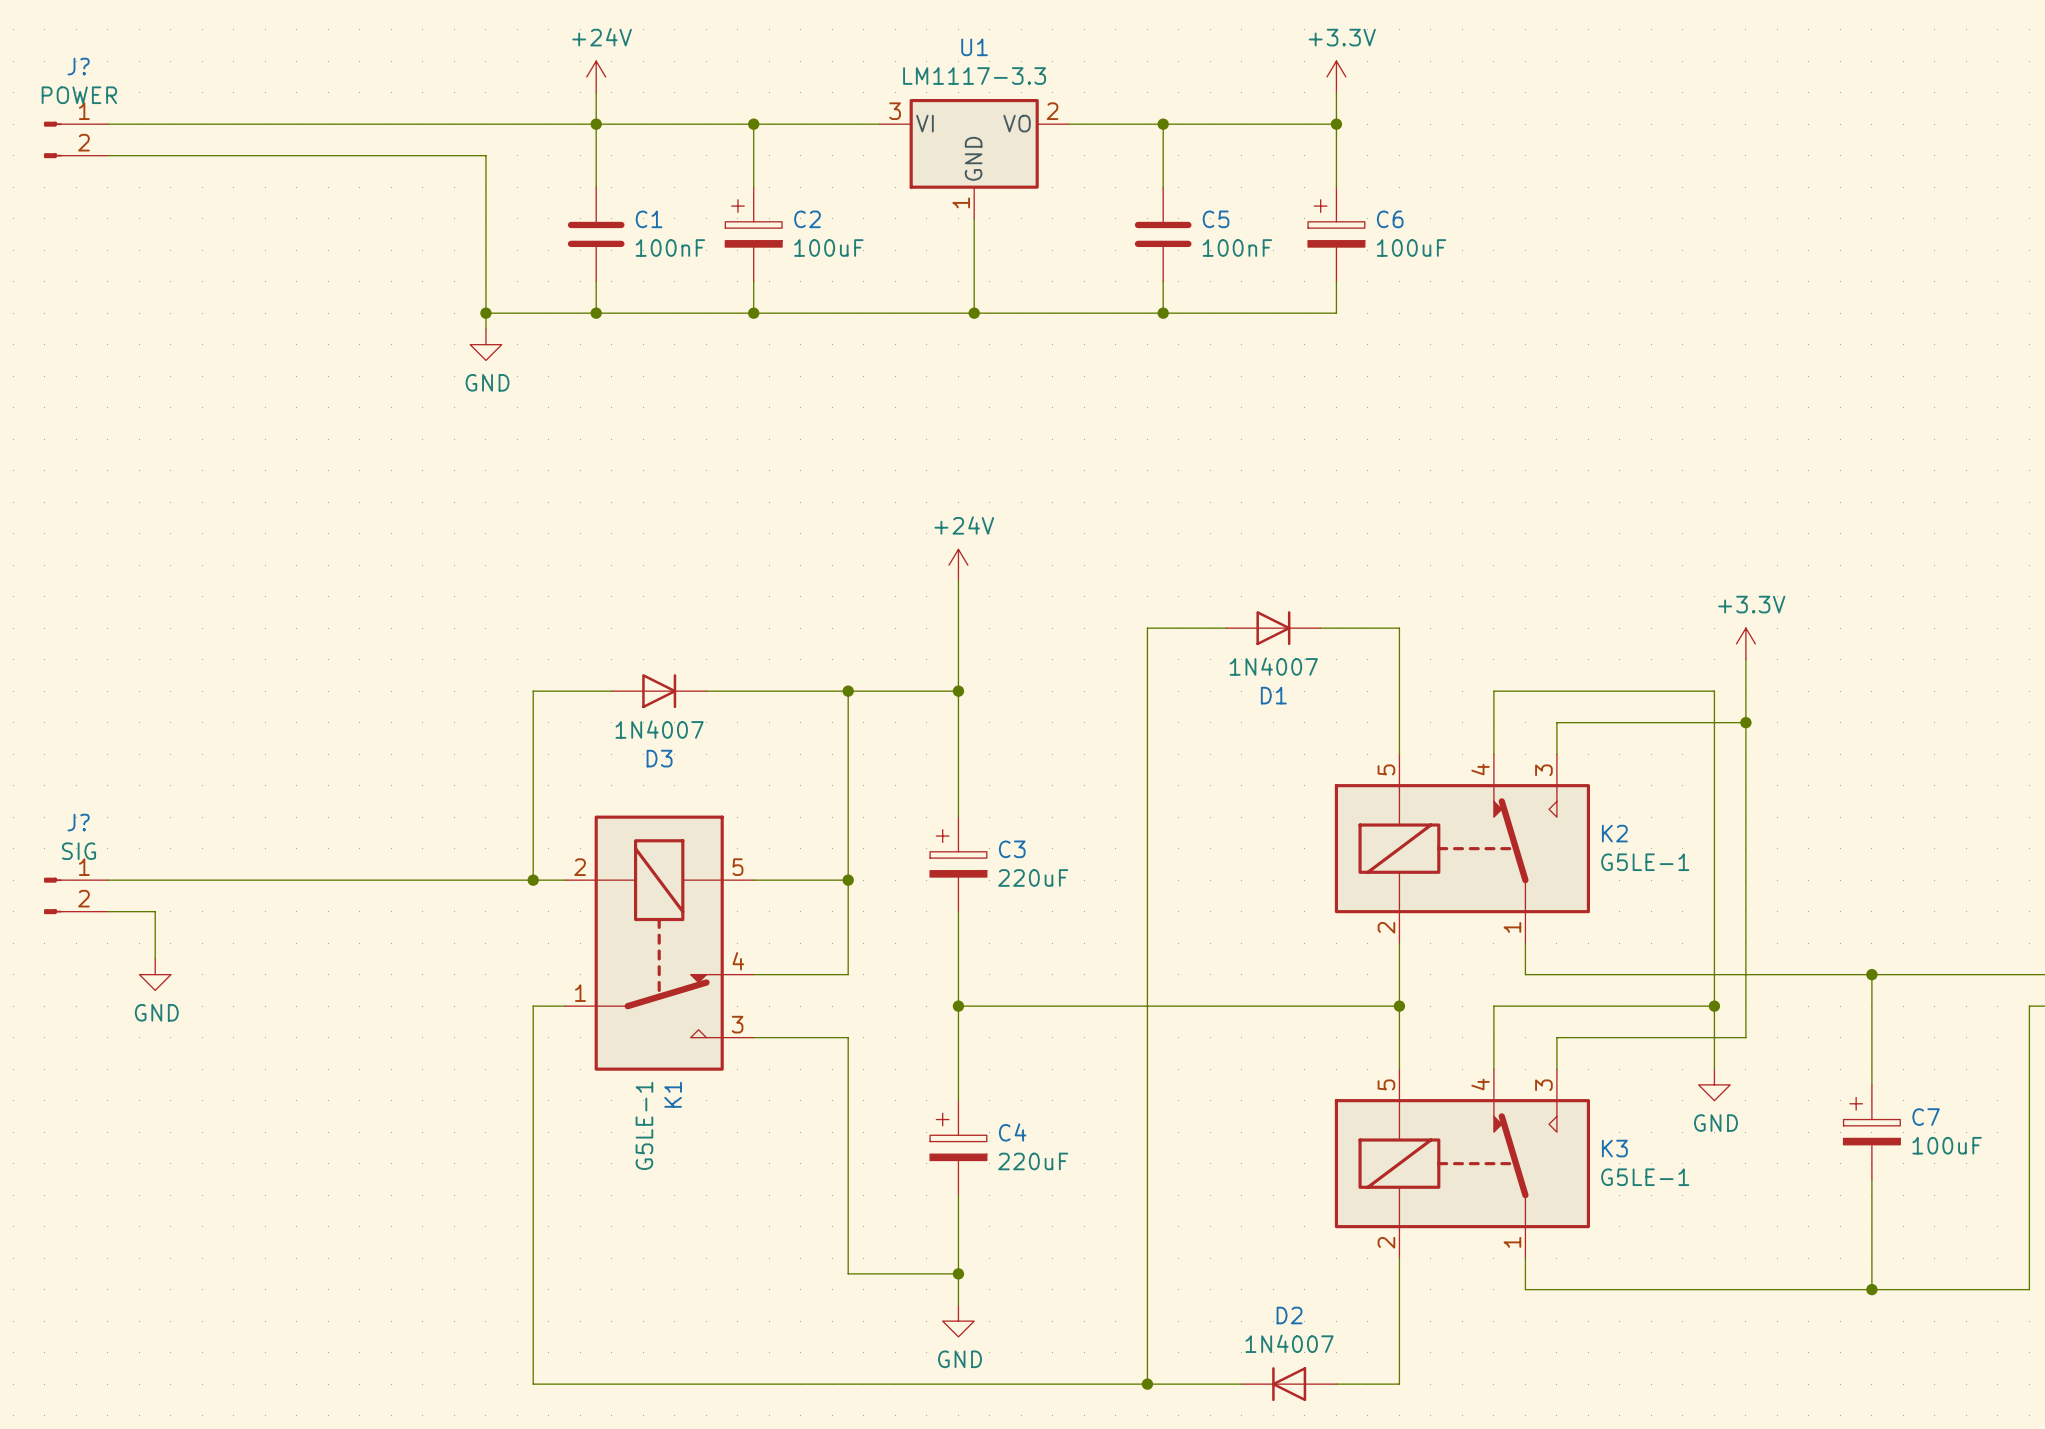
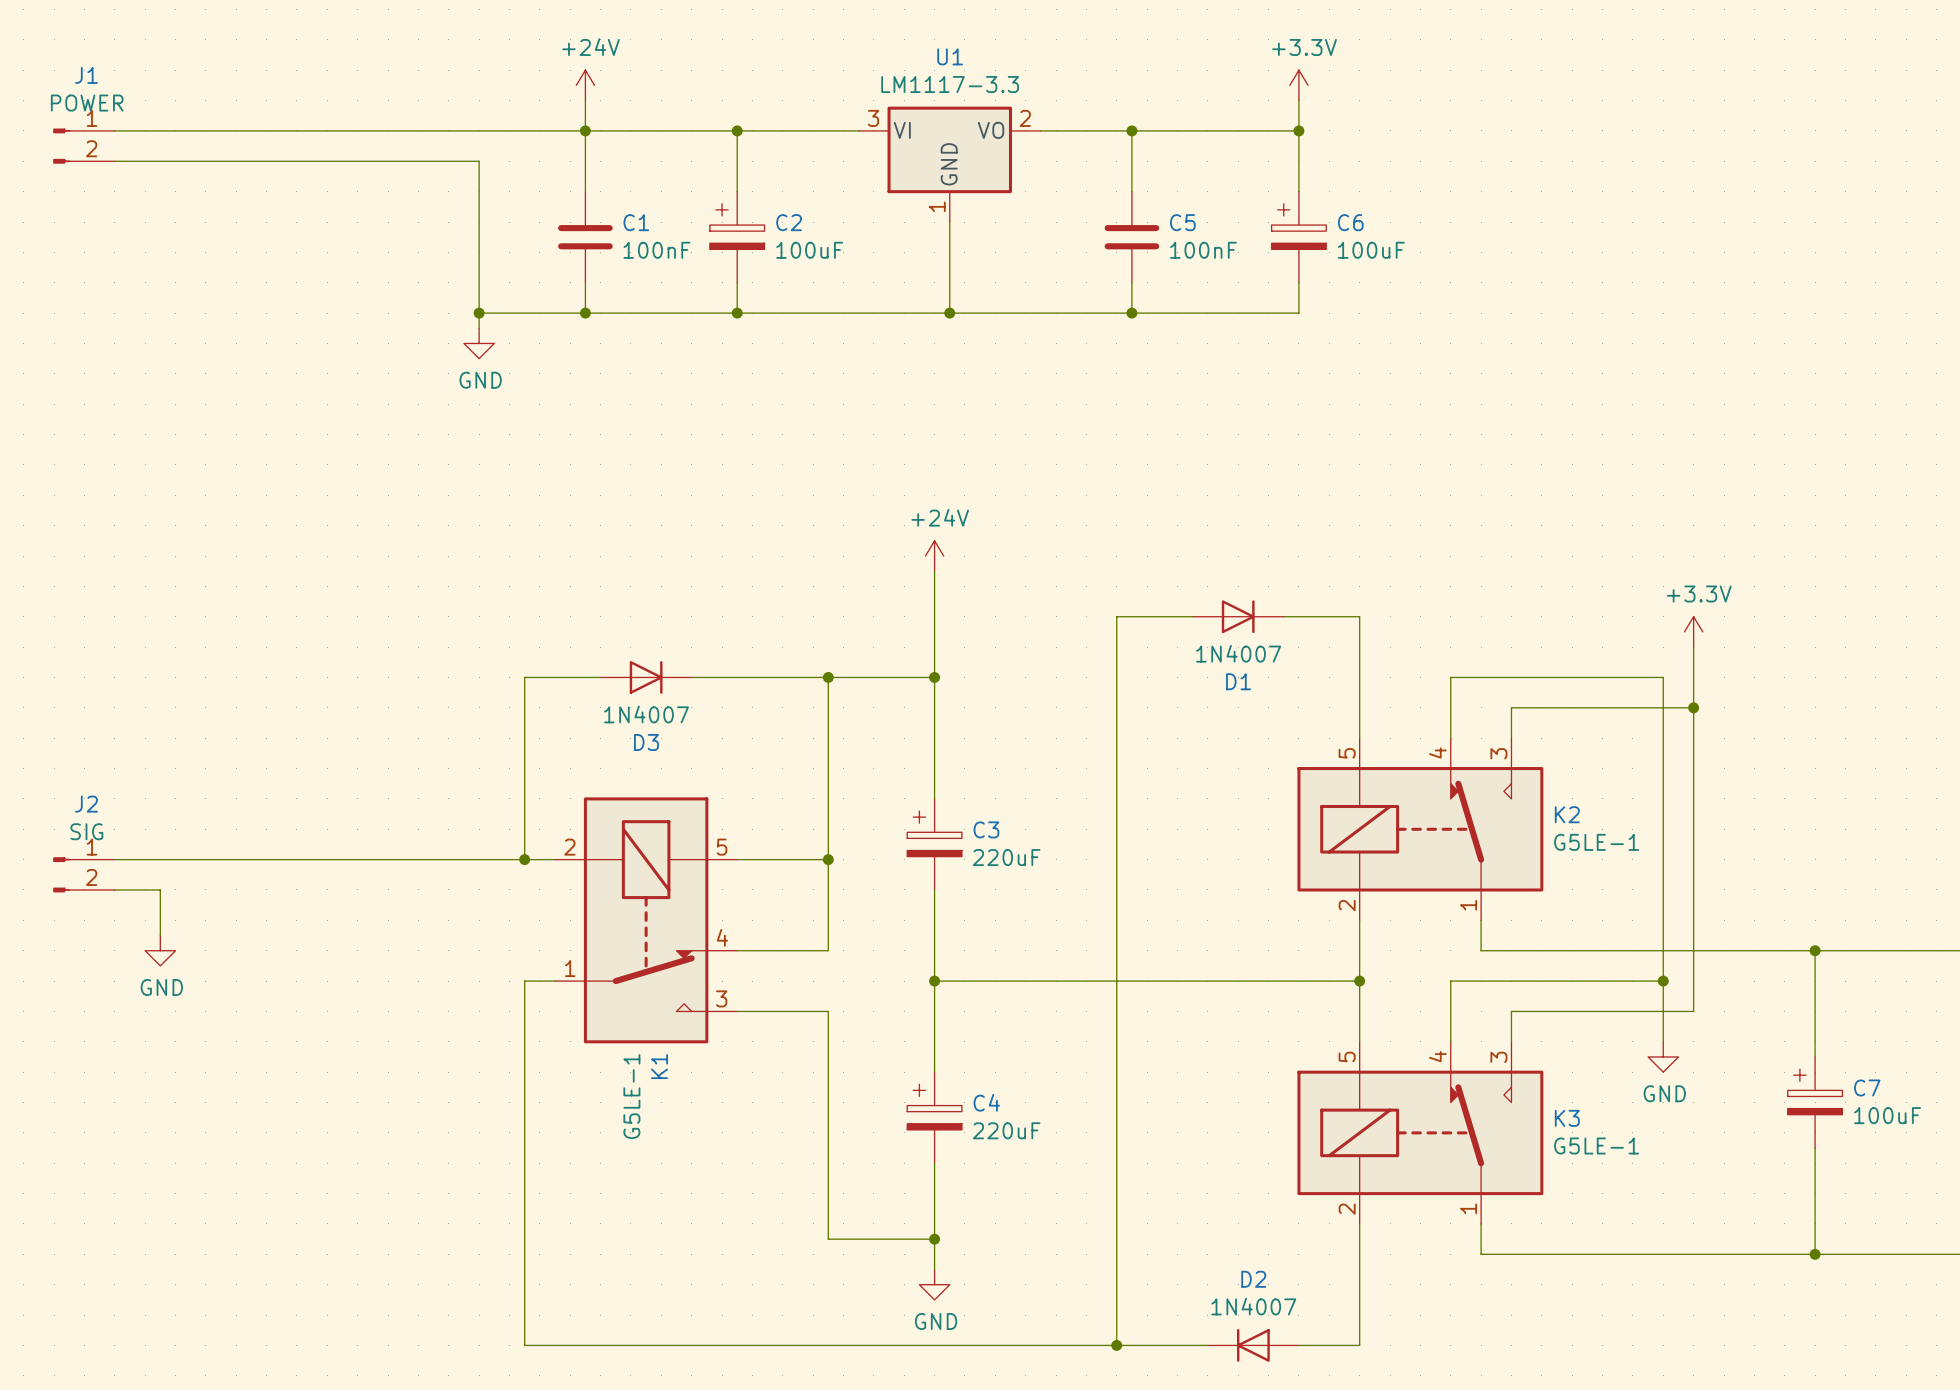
J? name: J? (78, 66) -> J1 (86, 75)
J? name: J? (78, 822) -> J2 (86, 804)

